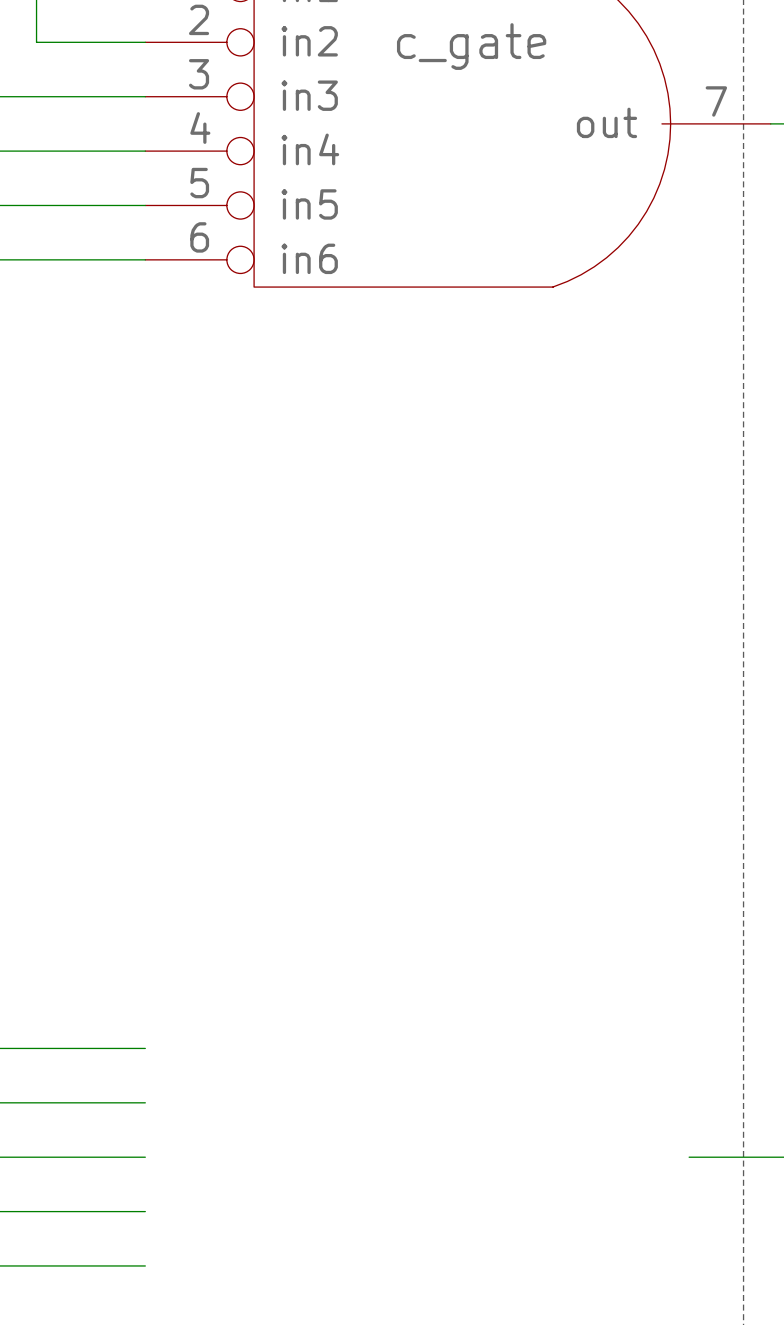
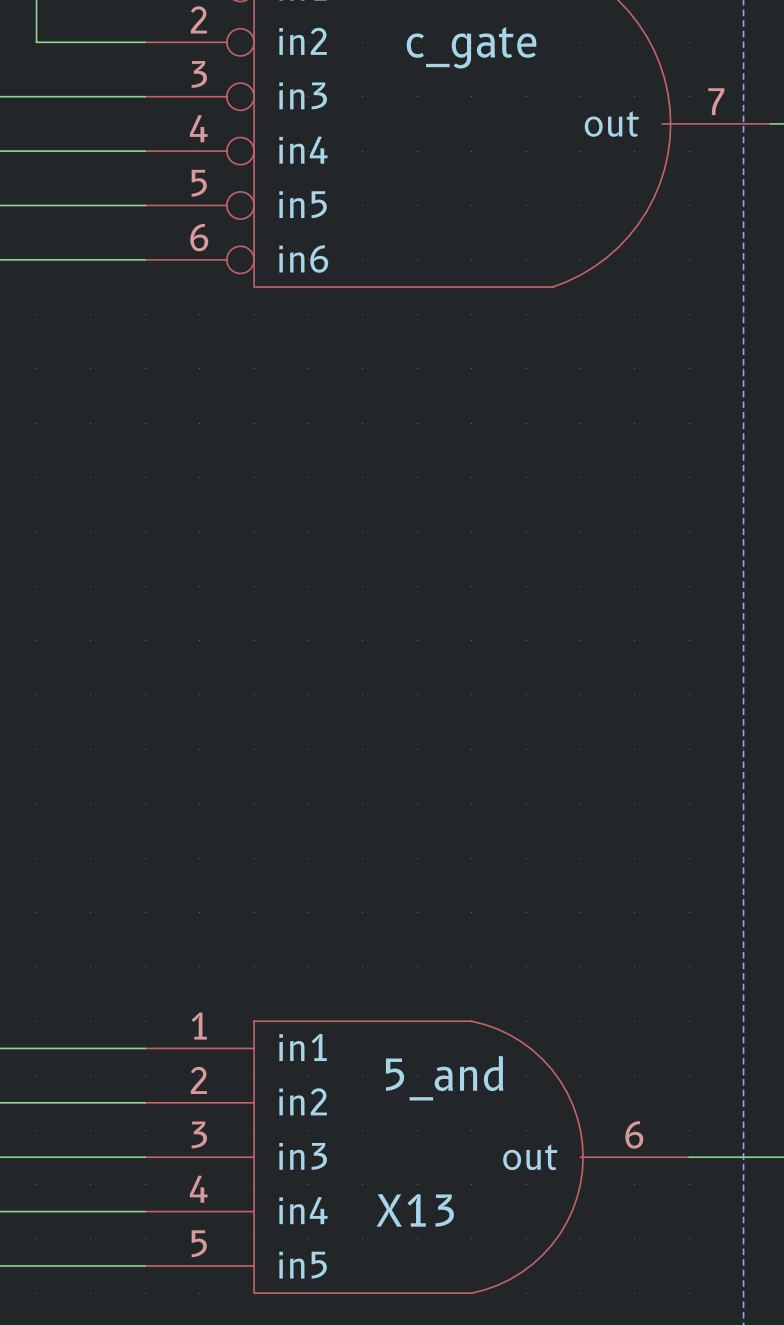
X13: none -> 5_and (417, 1157)

